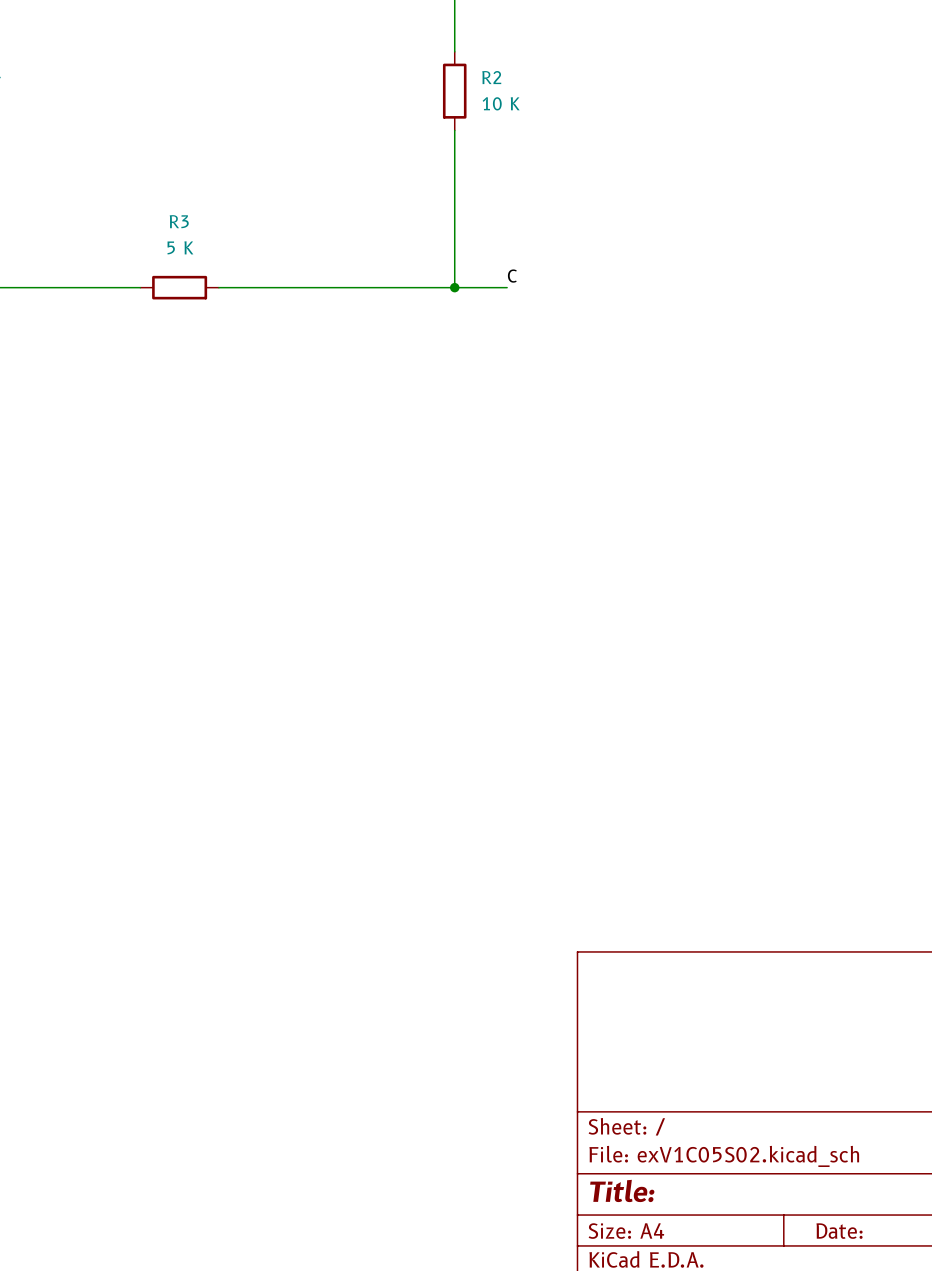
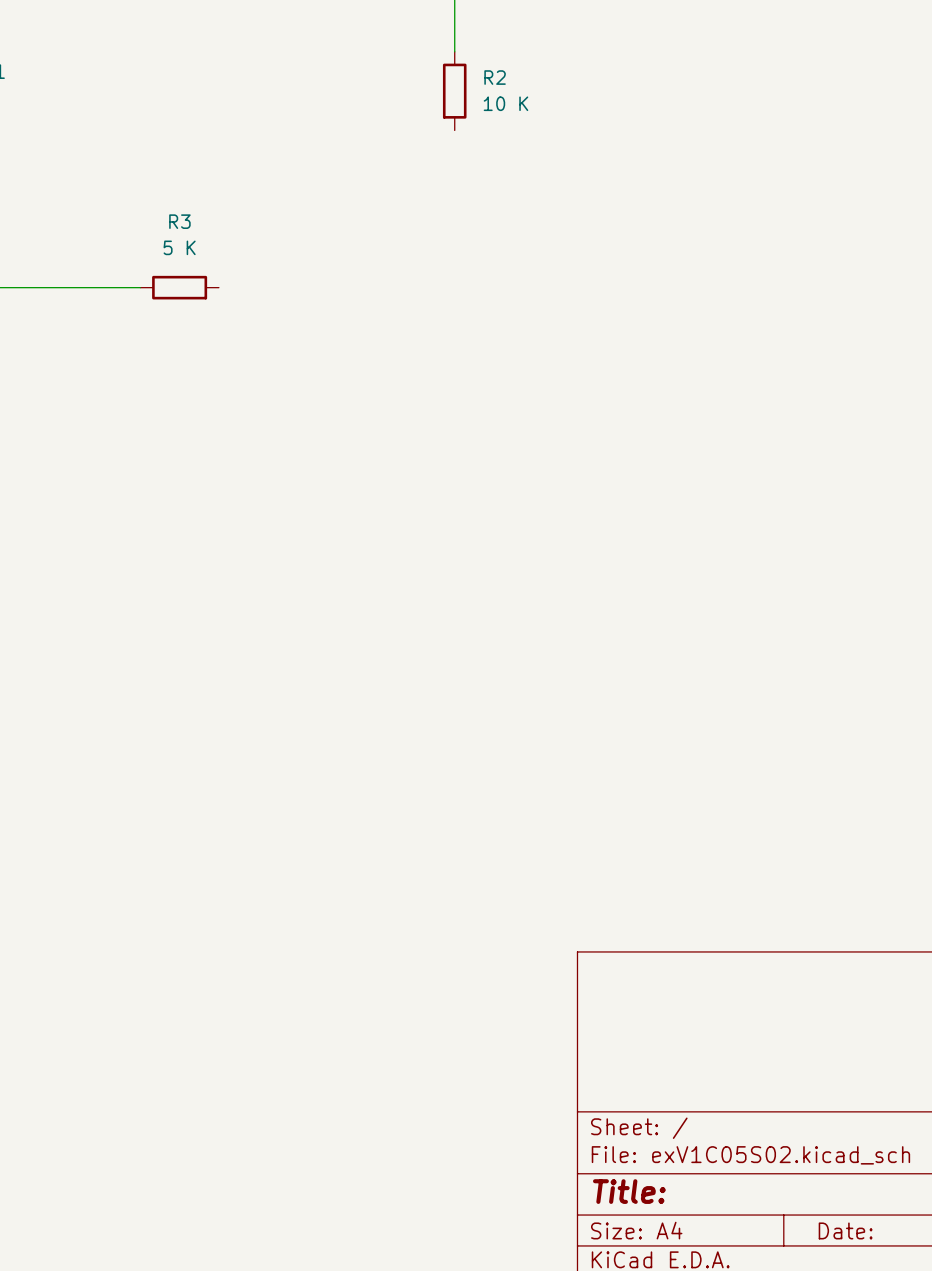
wire: (454, 130) (454, 287) -> none
label: C (512, 276) -> none
wire: (218, 287) (507, 287) -> none
junction: (454, 287) -> none

